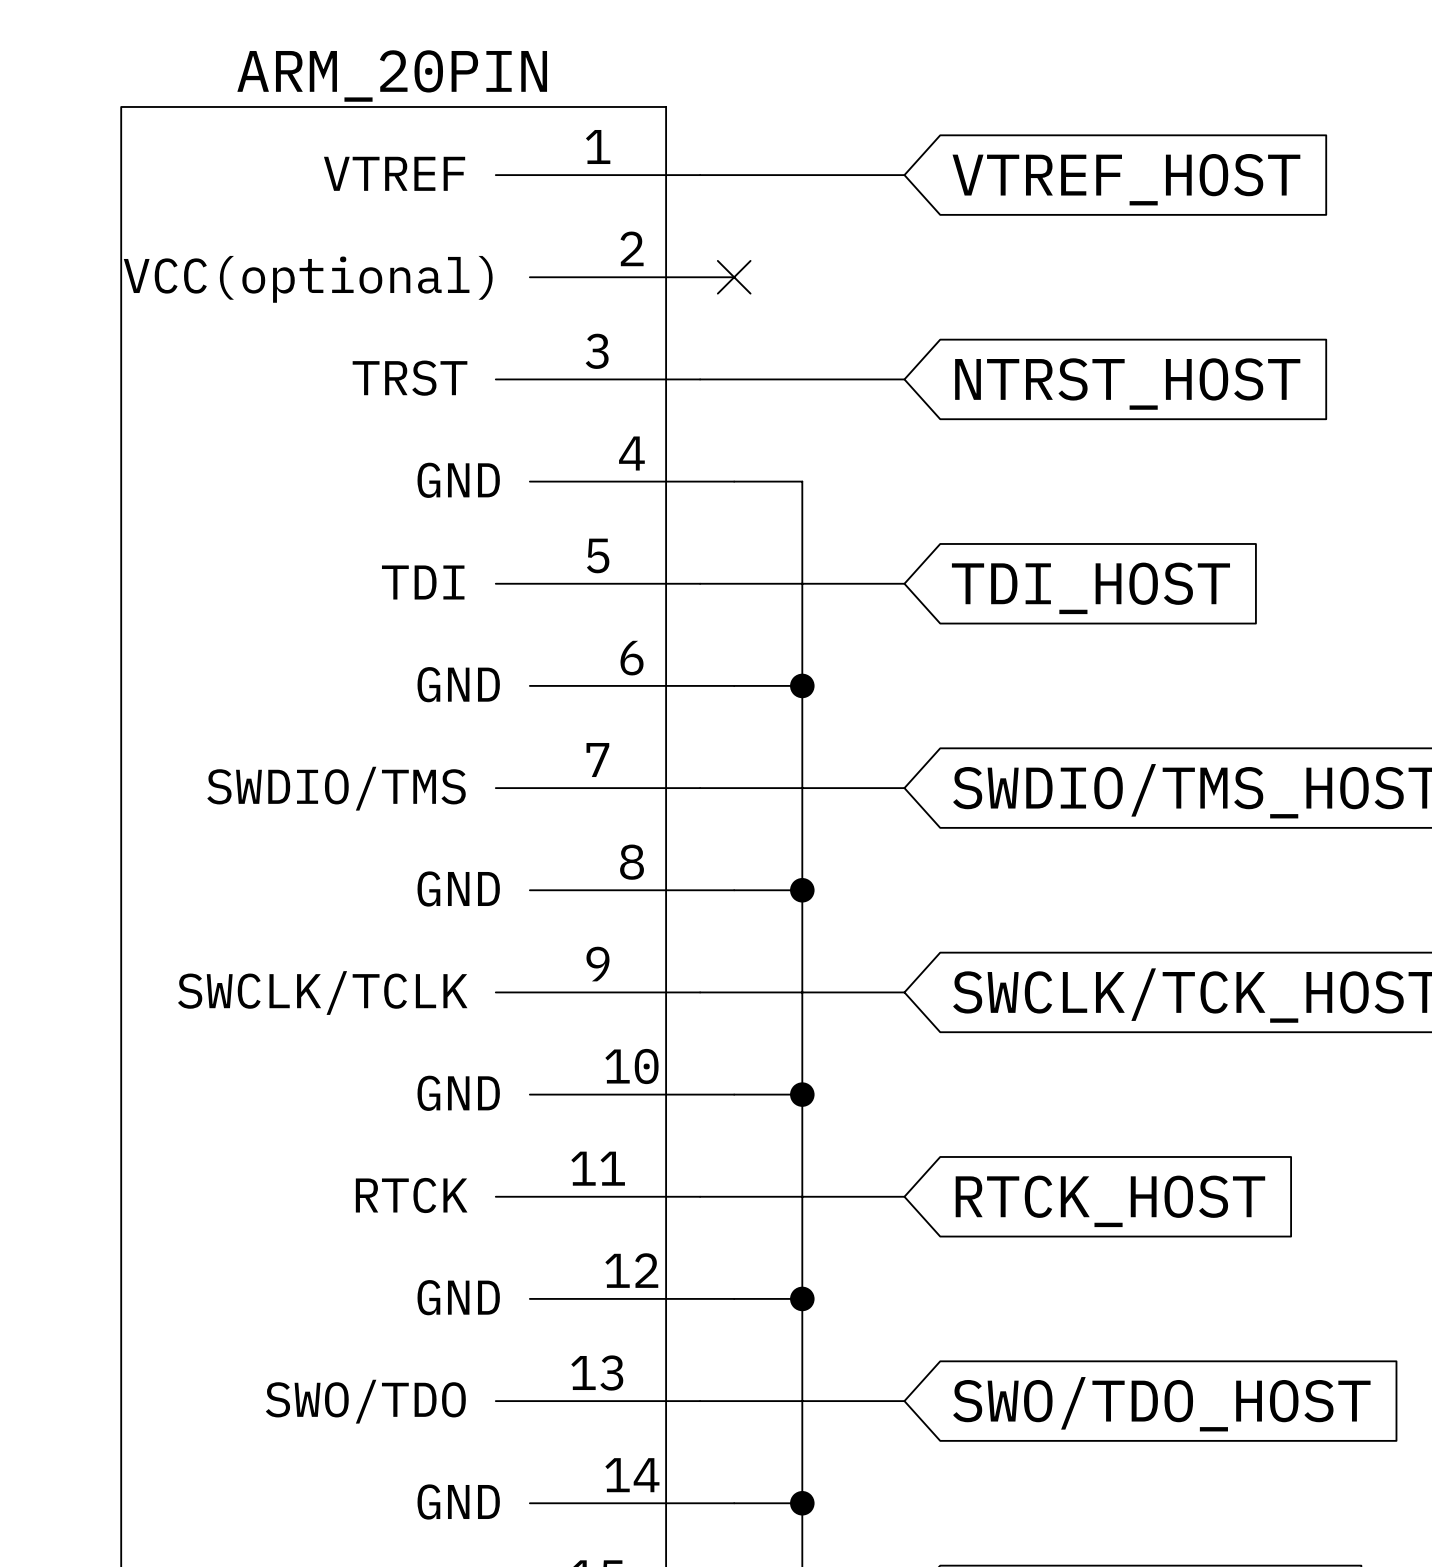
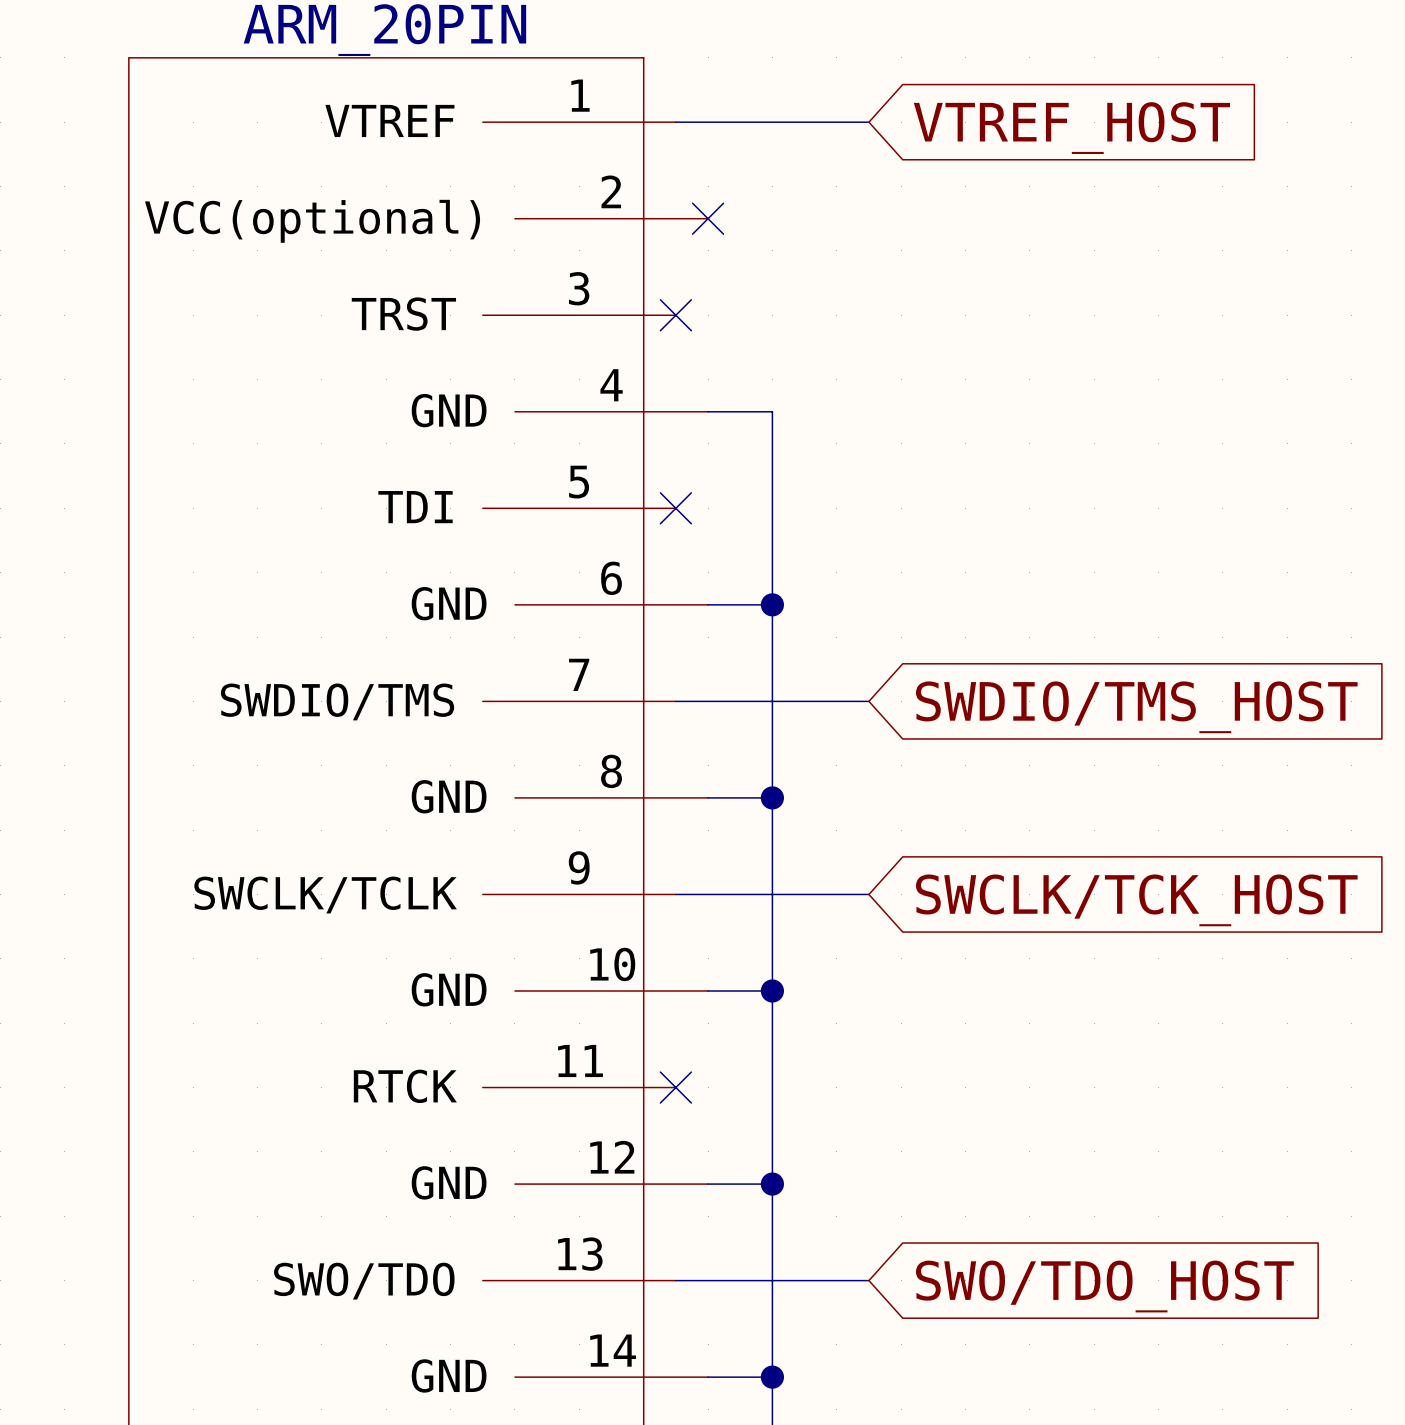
wire: (700, 379) (904, 379) -> none
no-connect mark: none -> (675, 315)
global label: NTRST_HOST (1127, 384) -> none
wire: (700, 583) (904, 583) -> none
no-connect mark: none -> (675, 508)
global label: TDI_HOST (1090, 588) -> none
wire: (700, 1196) (904, 1196) -> none
no-connect mark: none -> (675, 1087)
global label: RTCK_HOST (1110, 1201) -> none

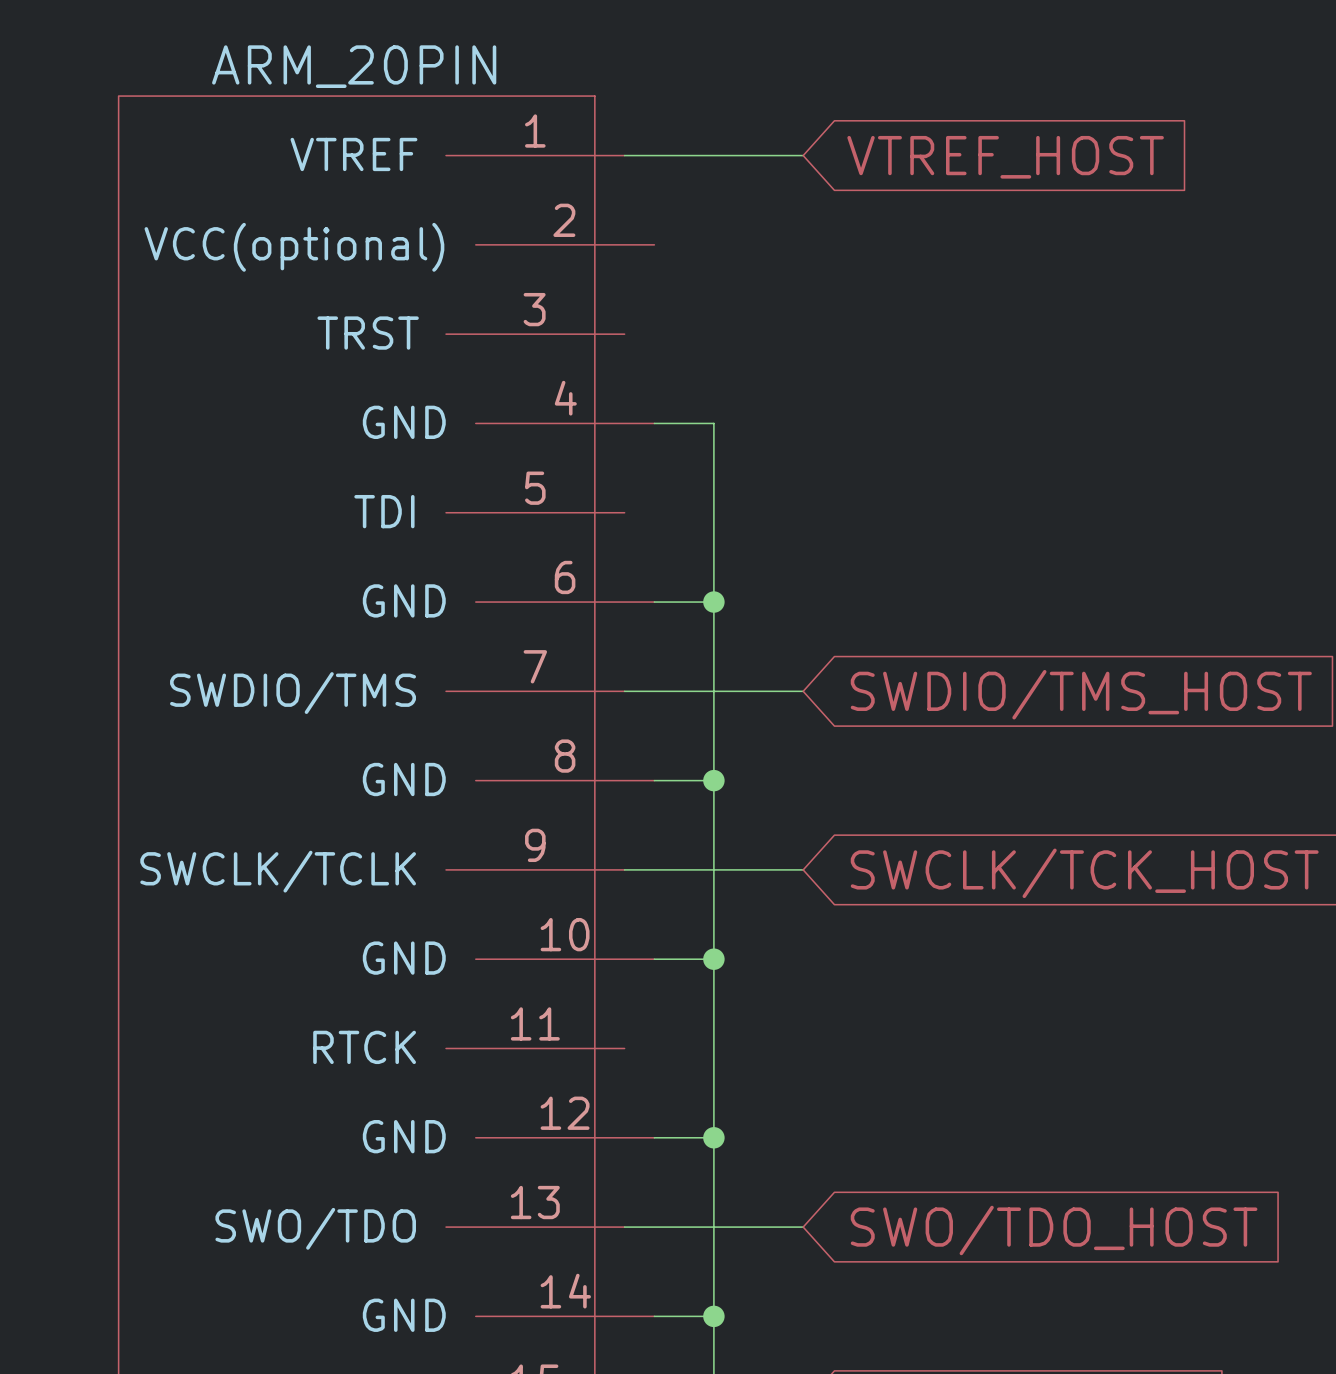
no-connect mark: (708, 218) -> none
no-connect mark: (675, 315) -> none
no-connect mark: (675, 508) -> none
no-connect mark: (675, 1087) -> none

